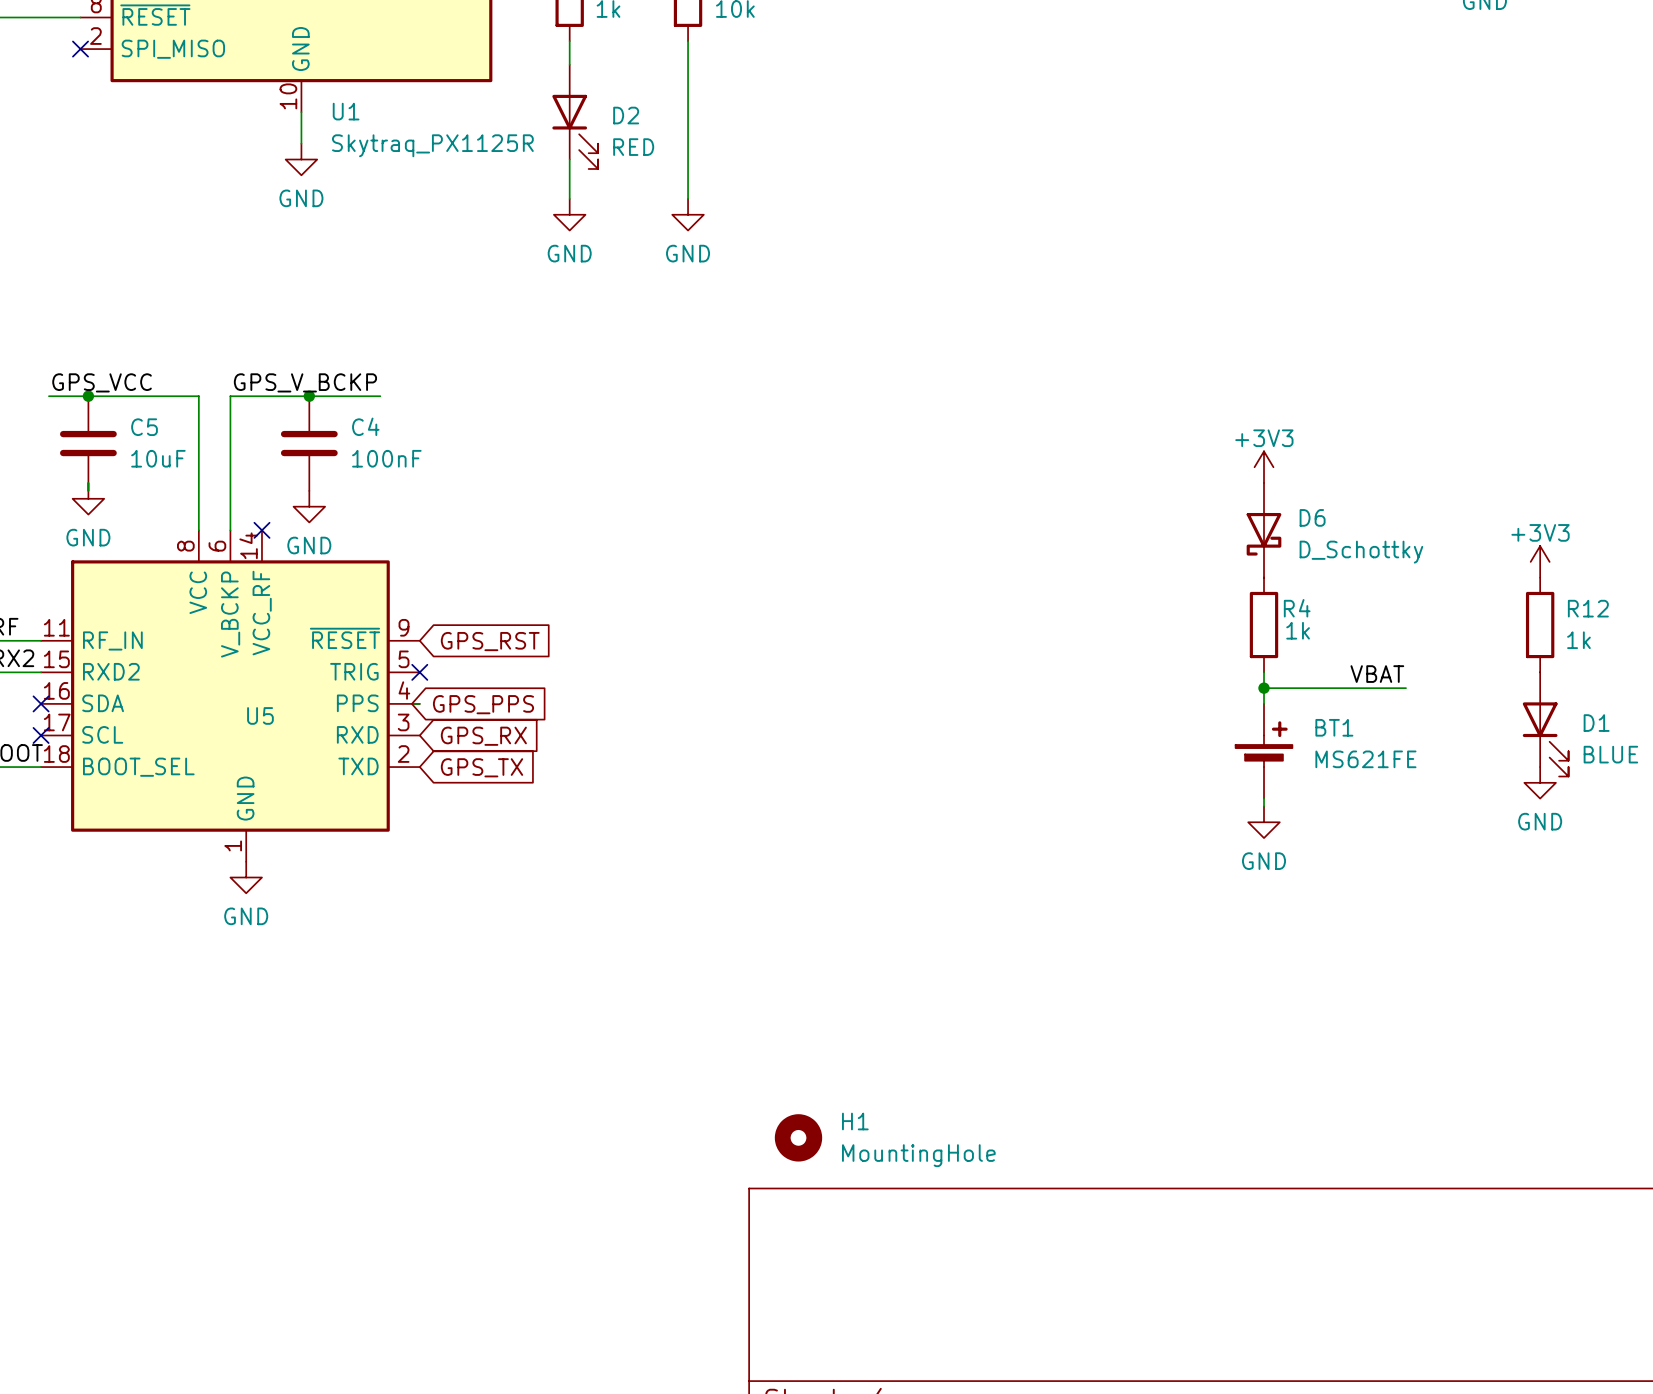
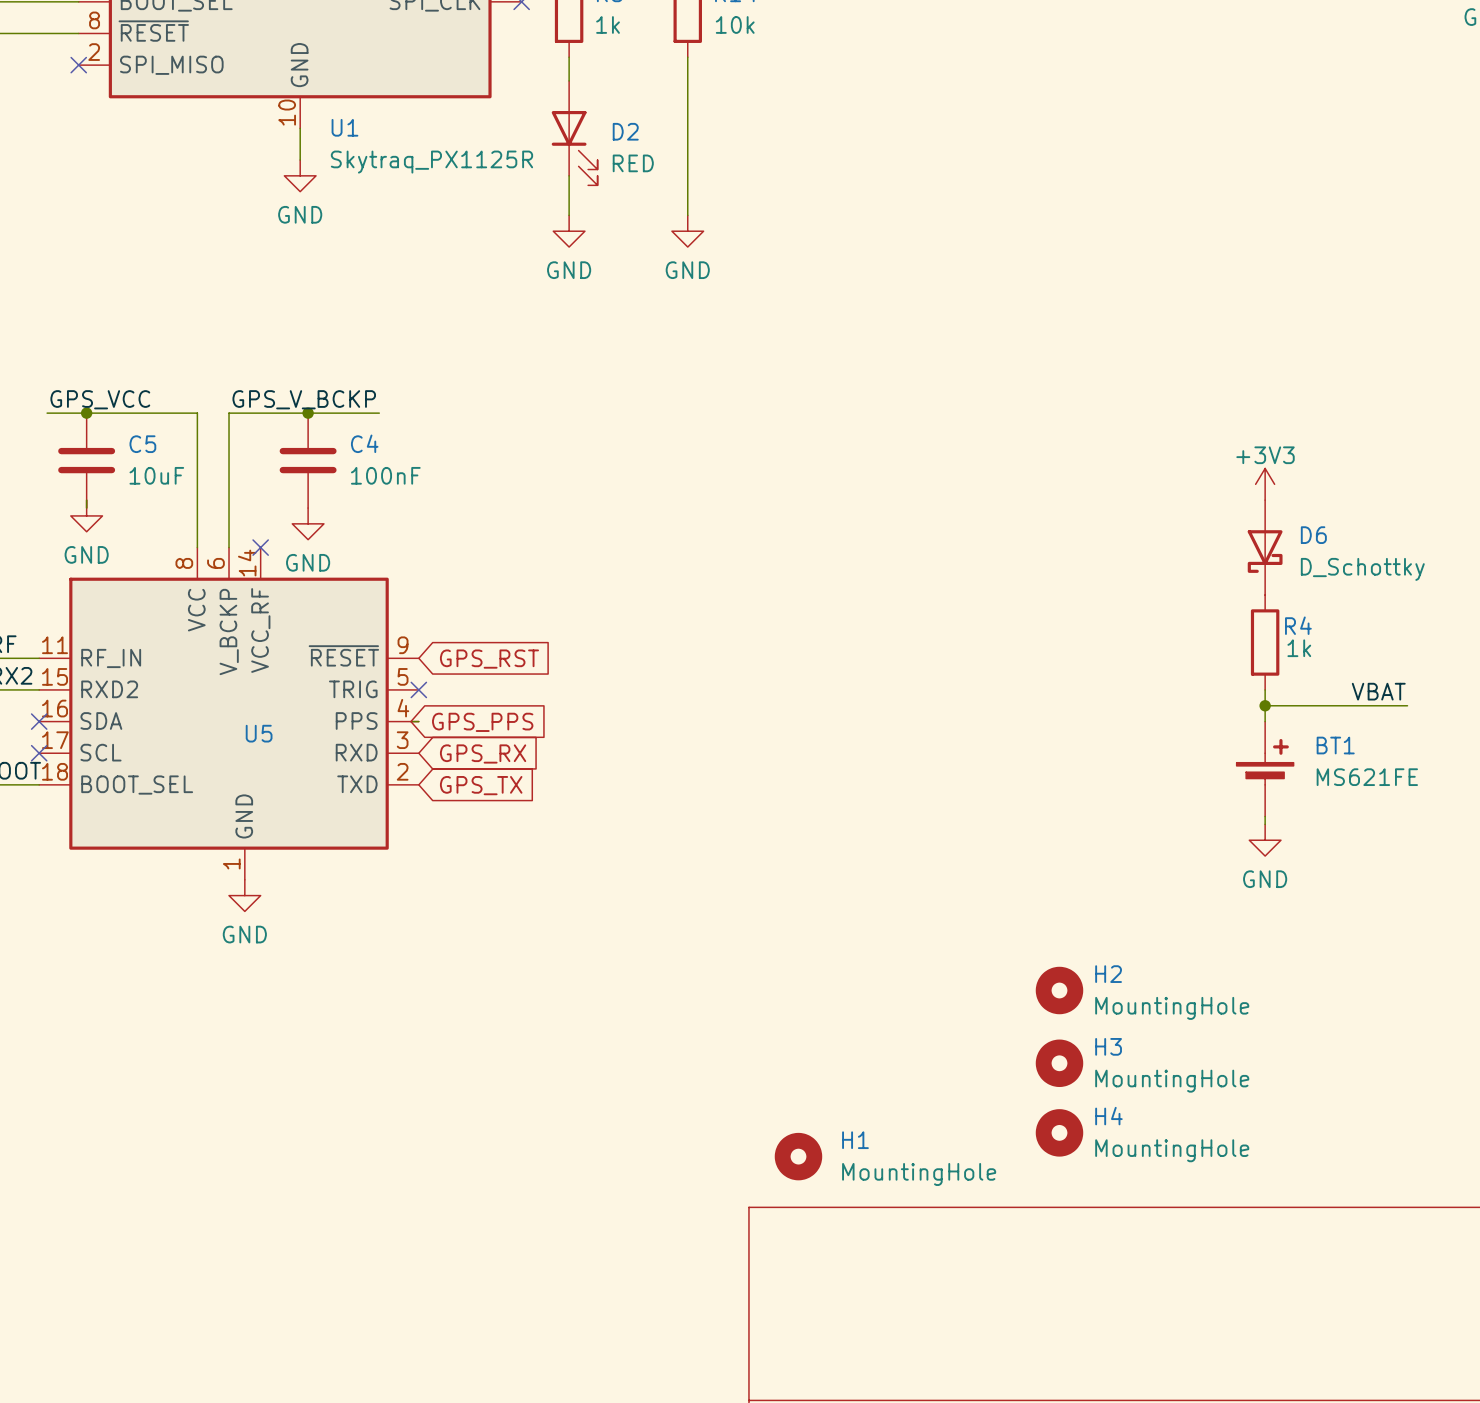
H2: none -> MountingHole (1059, 990)
H3: none -> MountingHole (1059, 1063)
H4: none -> MountingHole (1059, 1132)

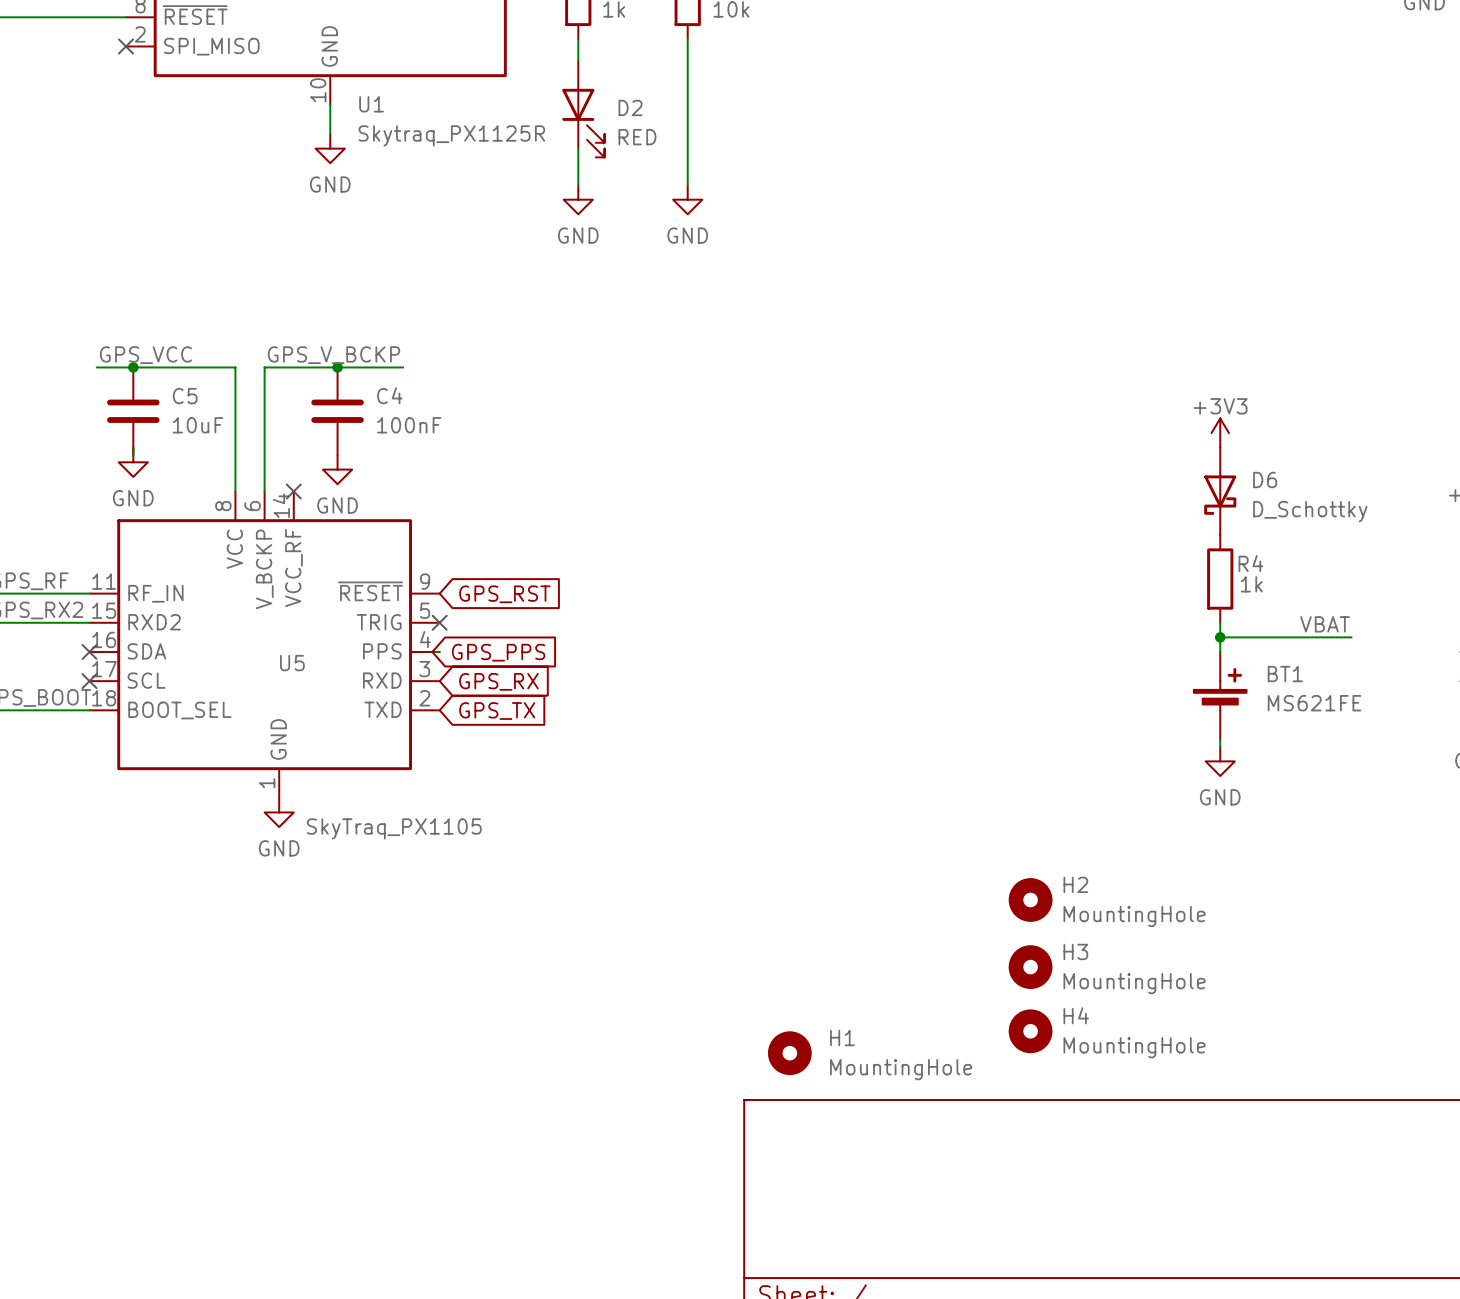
U5 value: none -> SkyTraq_PX1105 (394, 828)

